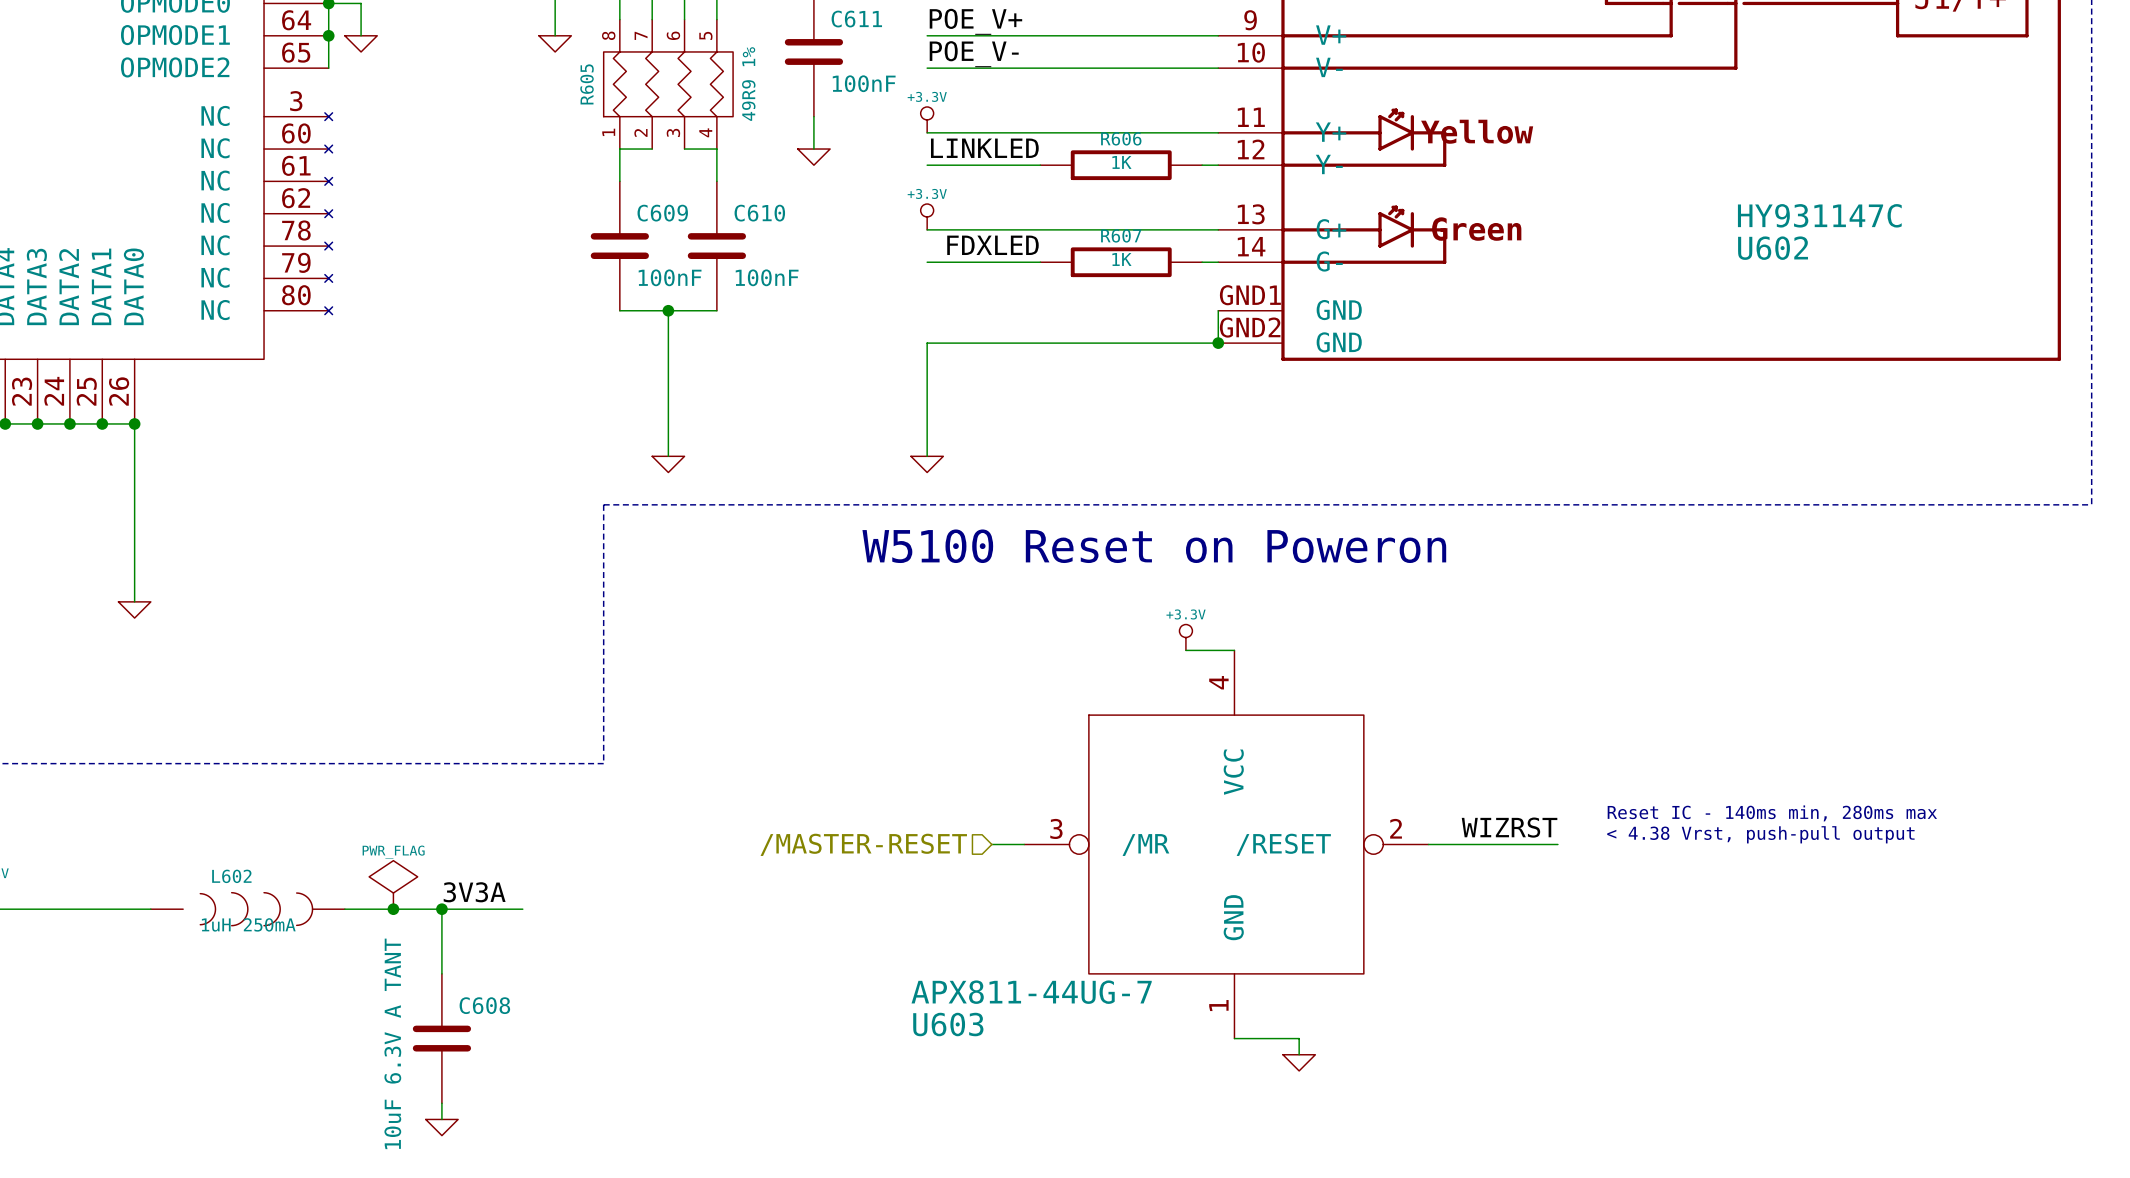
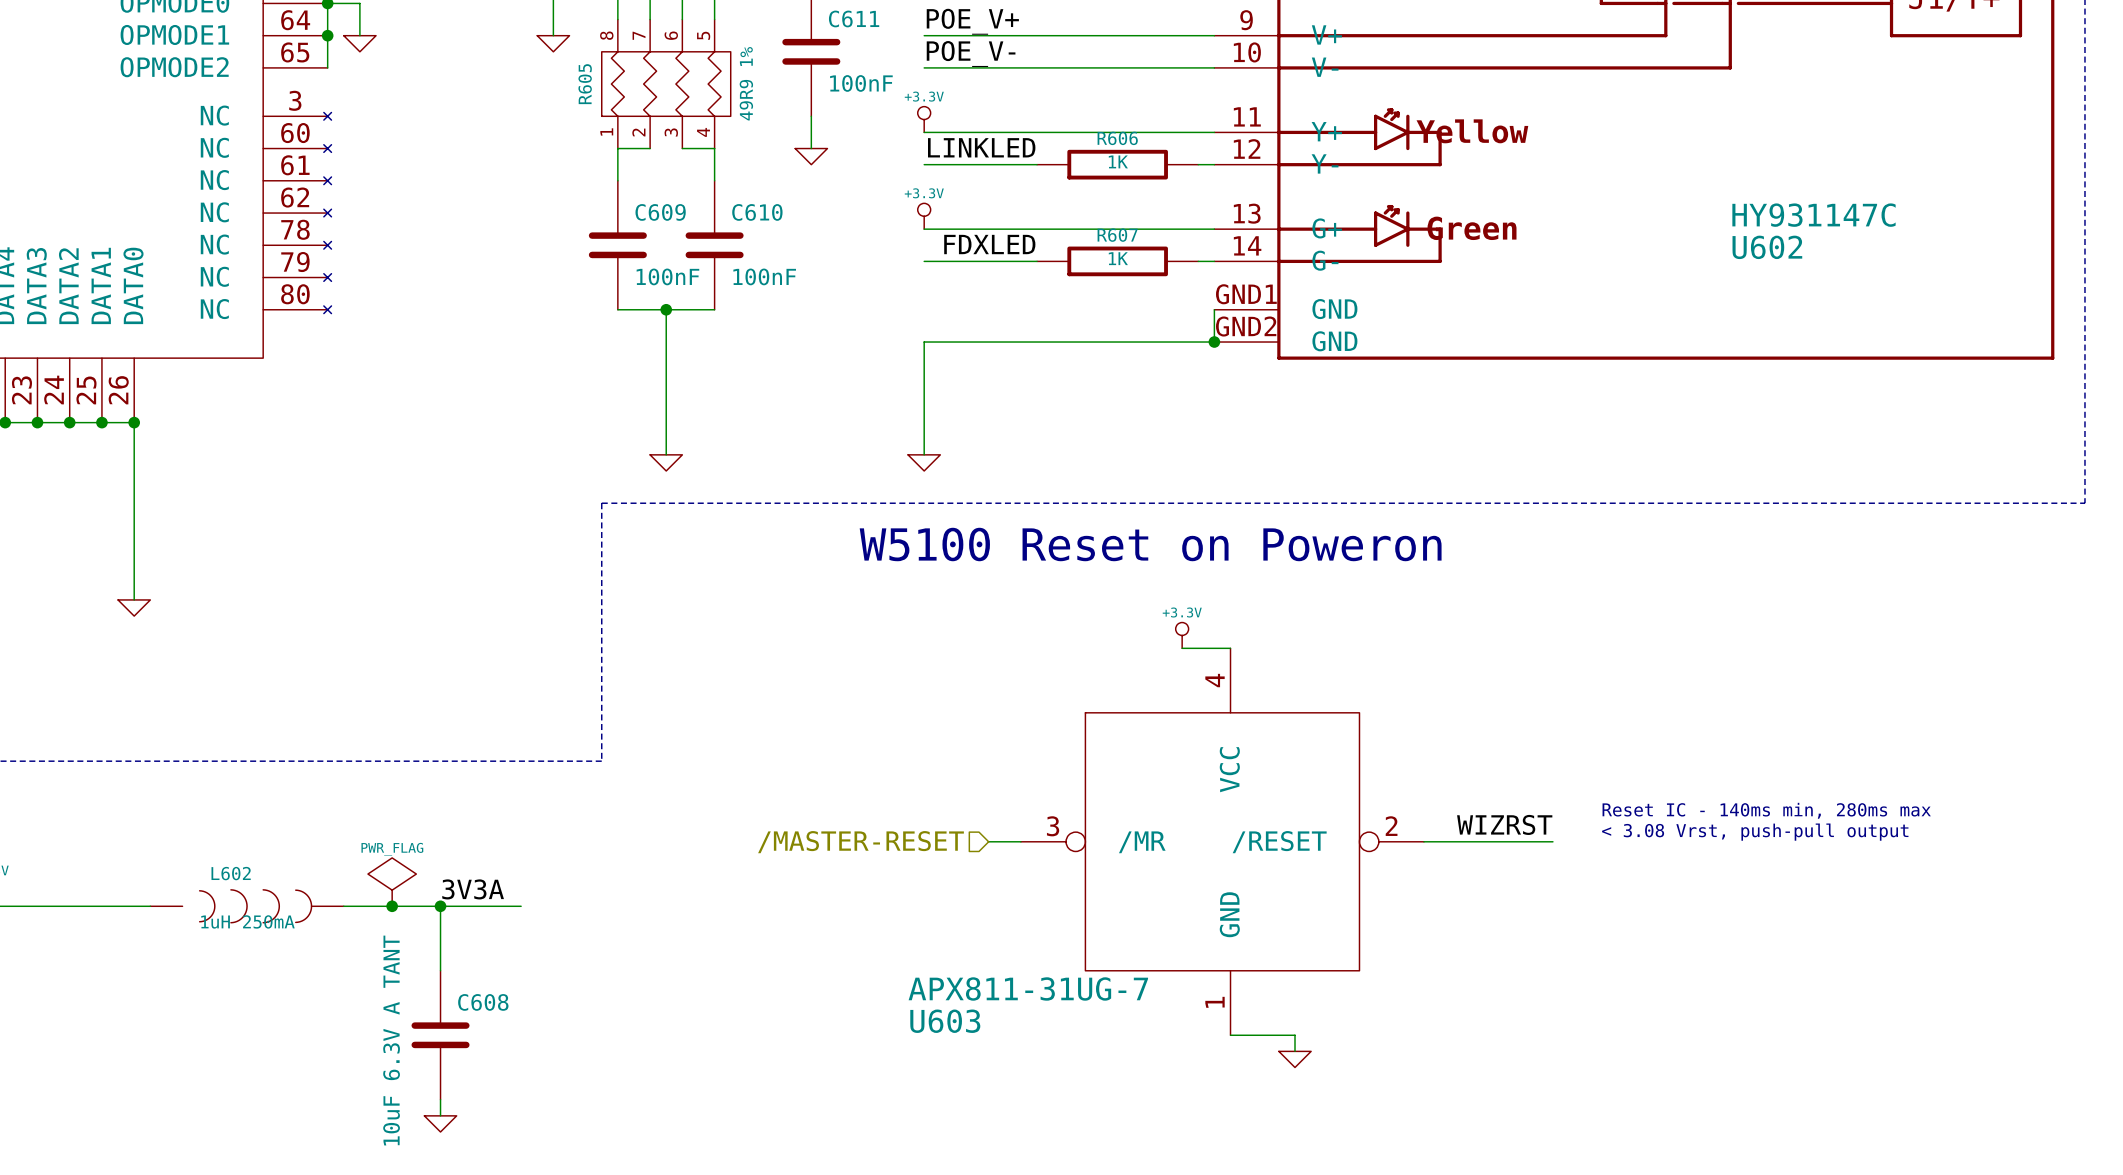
text: < 4.38 Vrst, push-pull output (1760, 834) -> < 3.08 Vrst, push-pull output (1755, 832)
U603 value: APX811-44UG-7 (1031, 992) -> APX811-31UG-7 (1028, 988)

